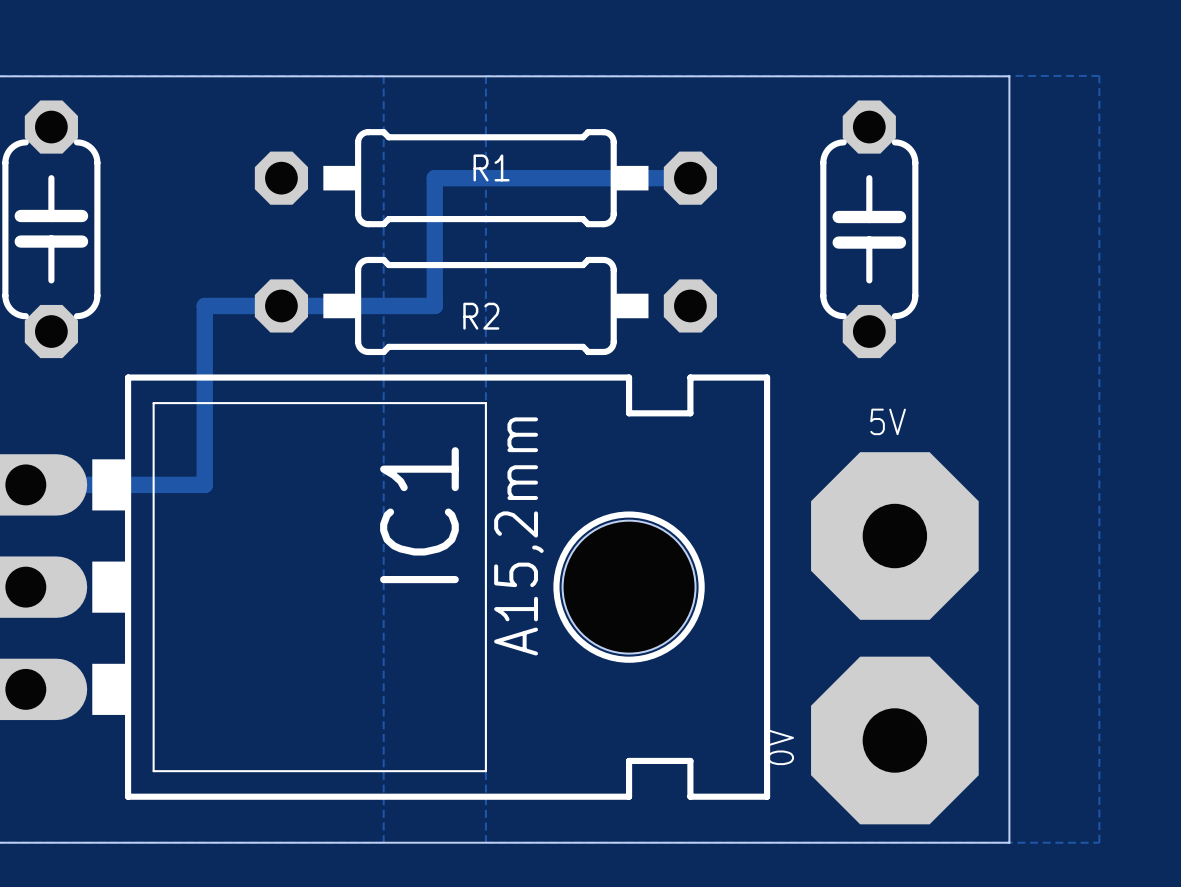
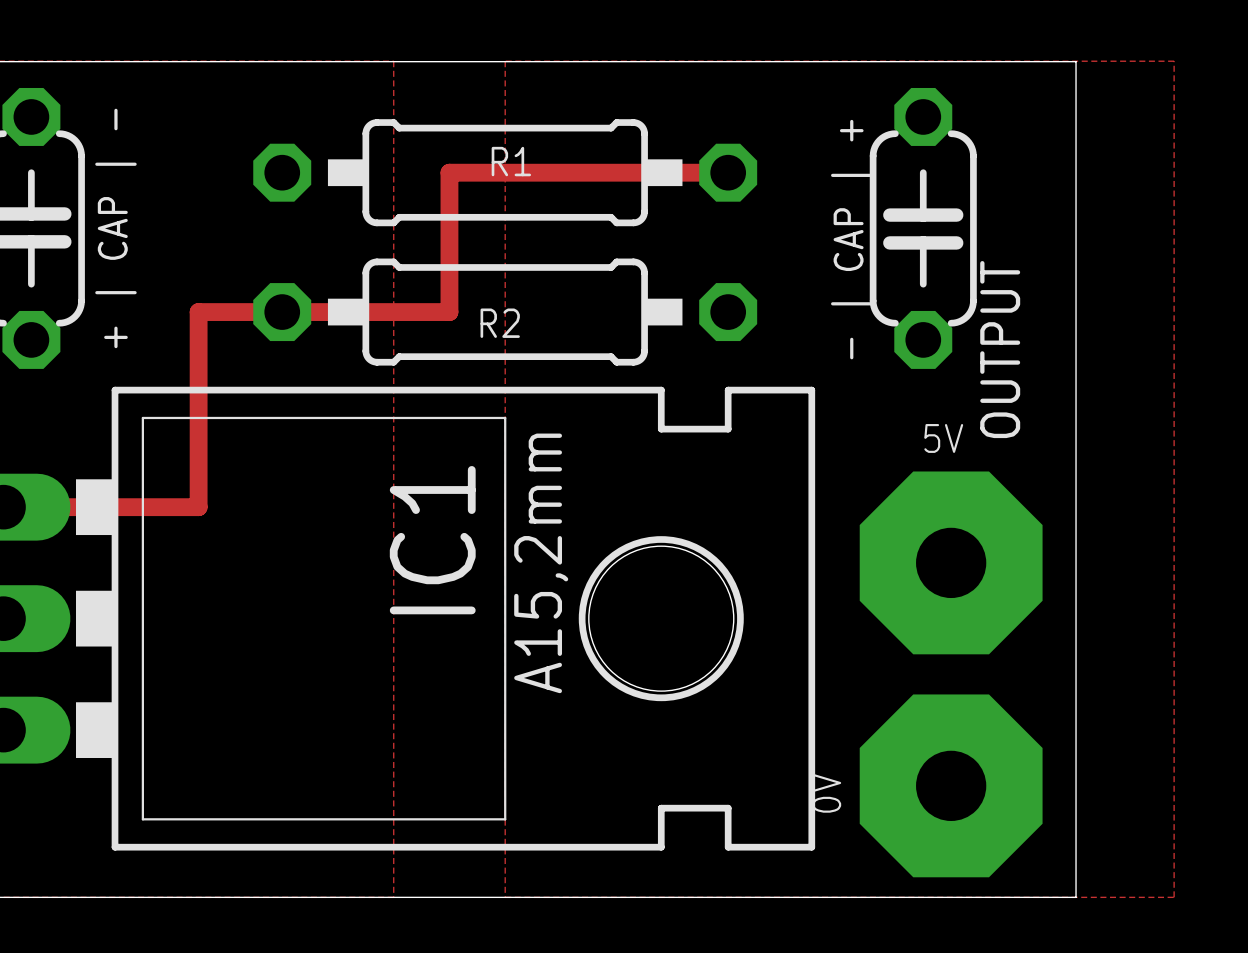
text: none -> + | CAP | - (115, 228)
text: none -> - | CAP | + (851, 239)
text: none -> OUTPUT (1000, 349)

